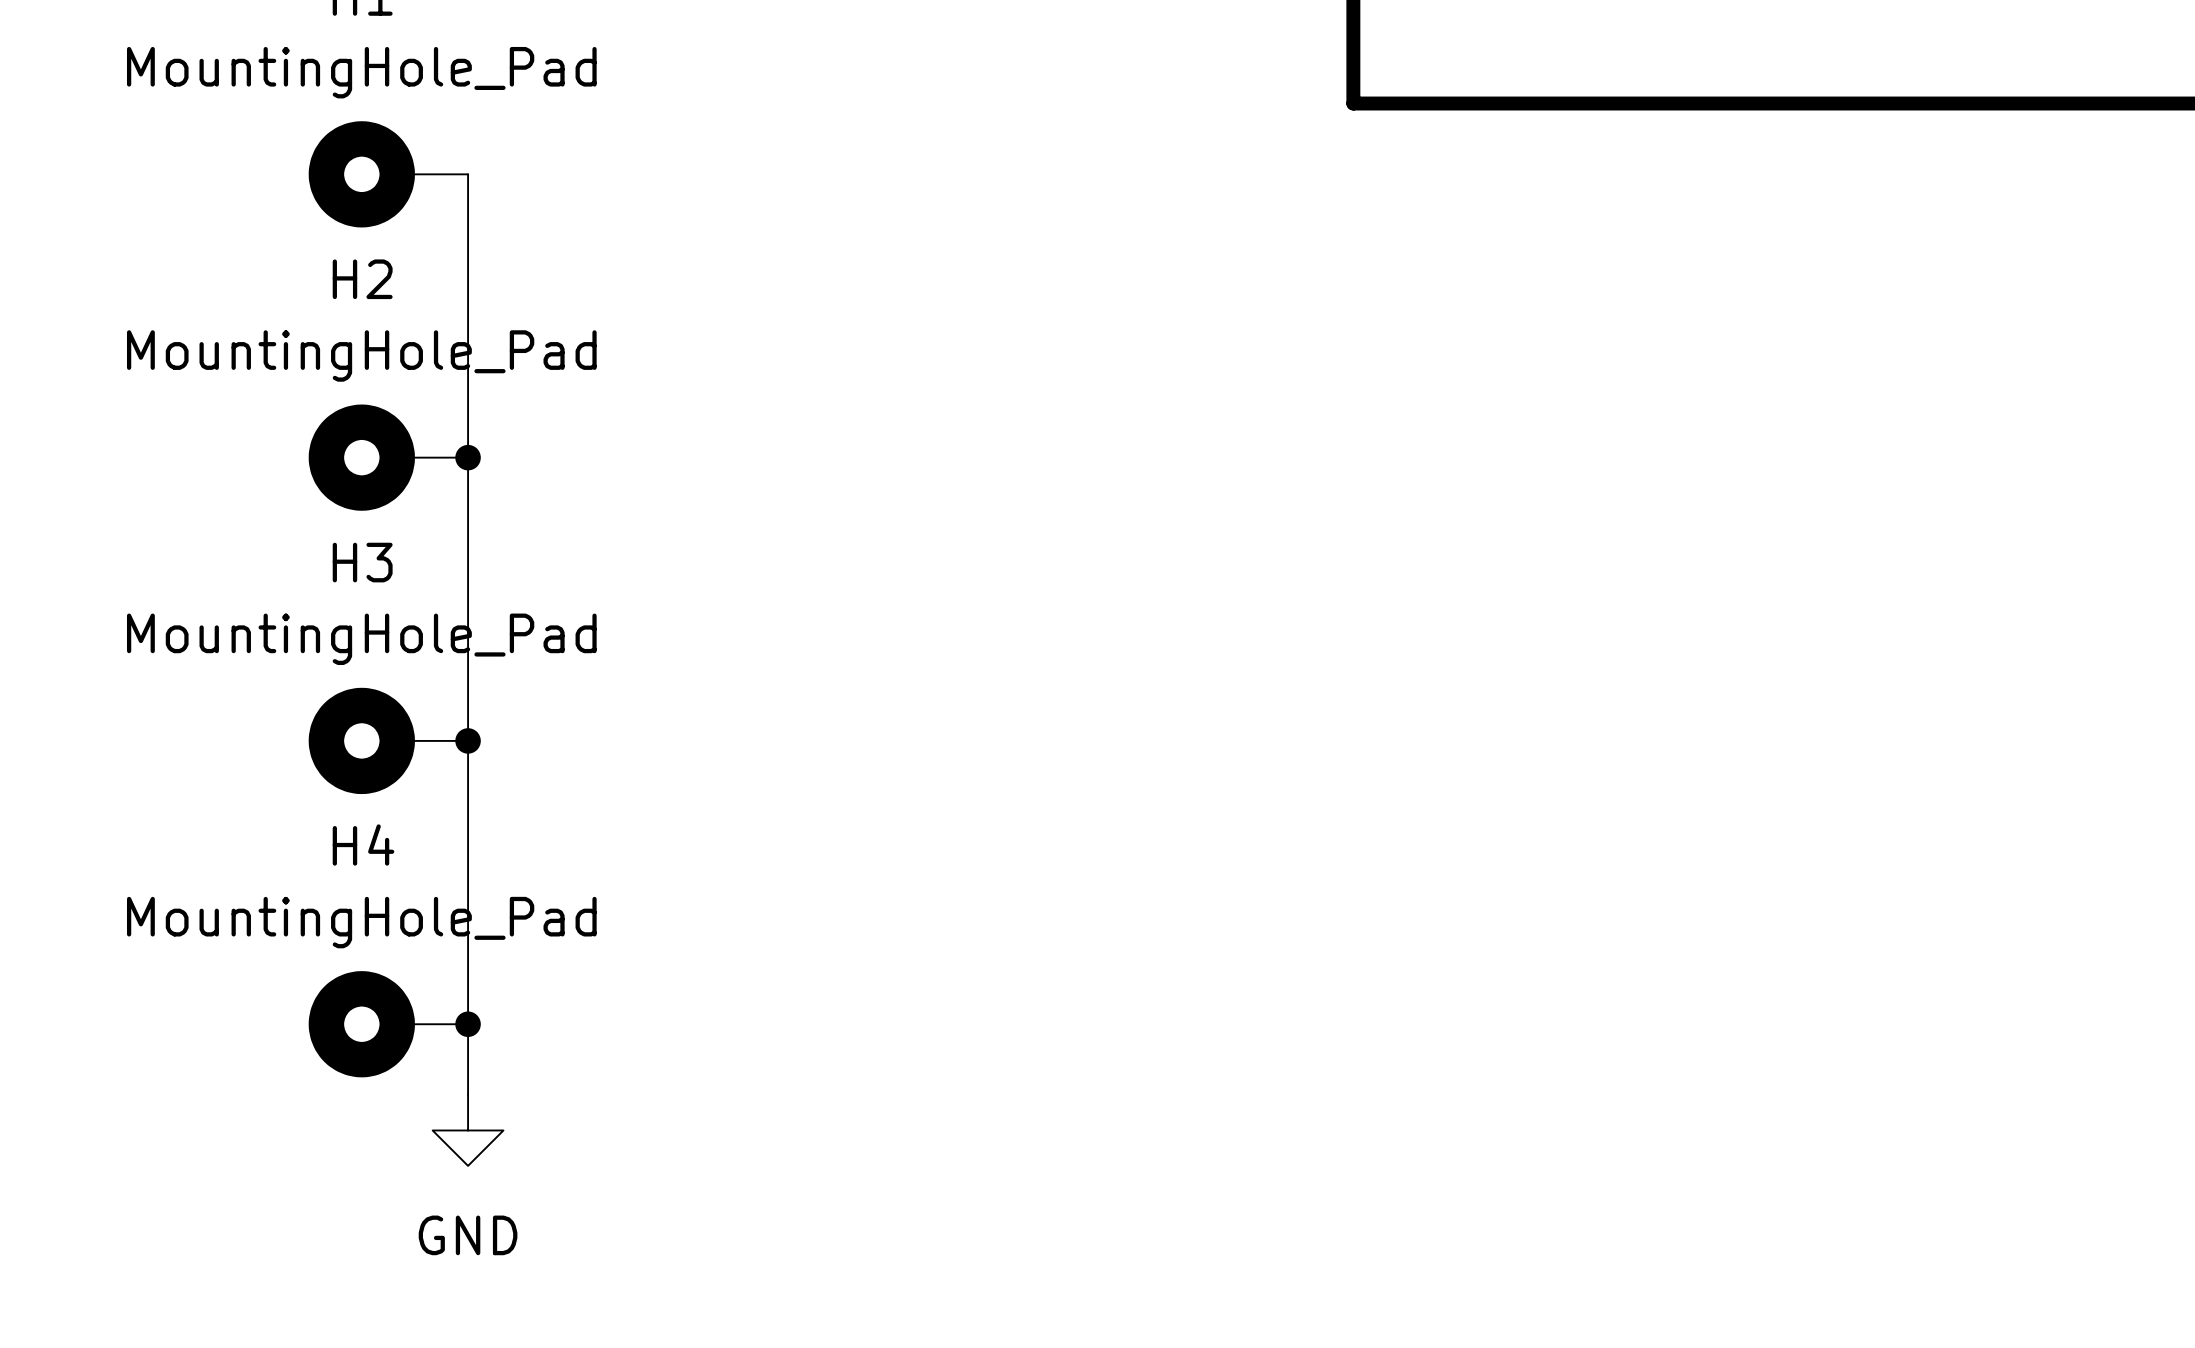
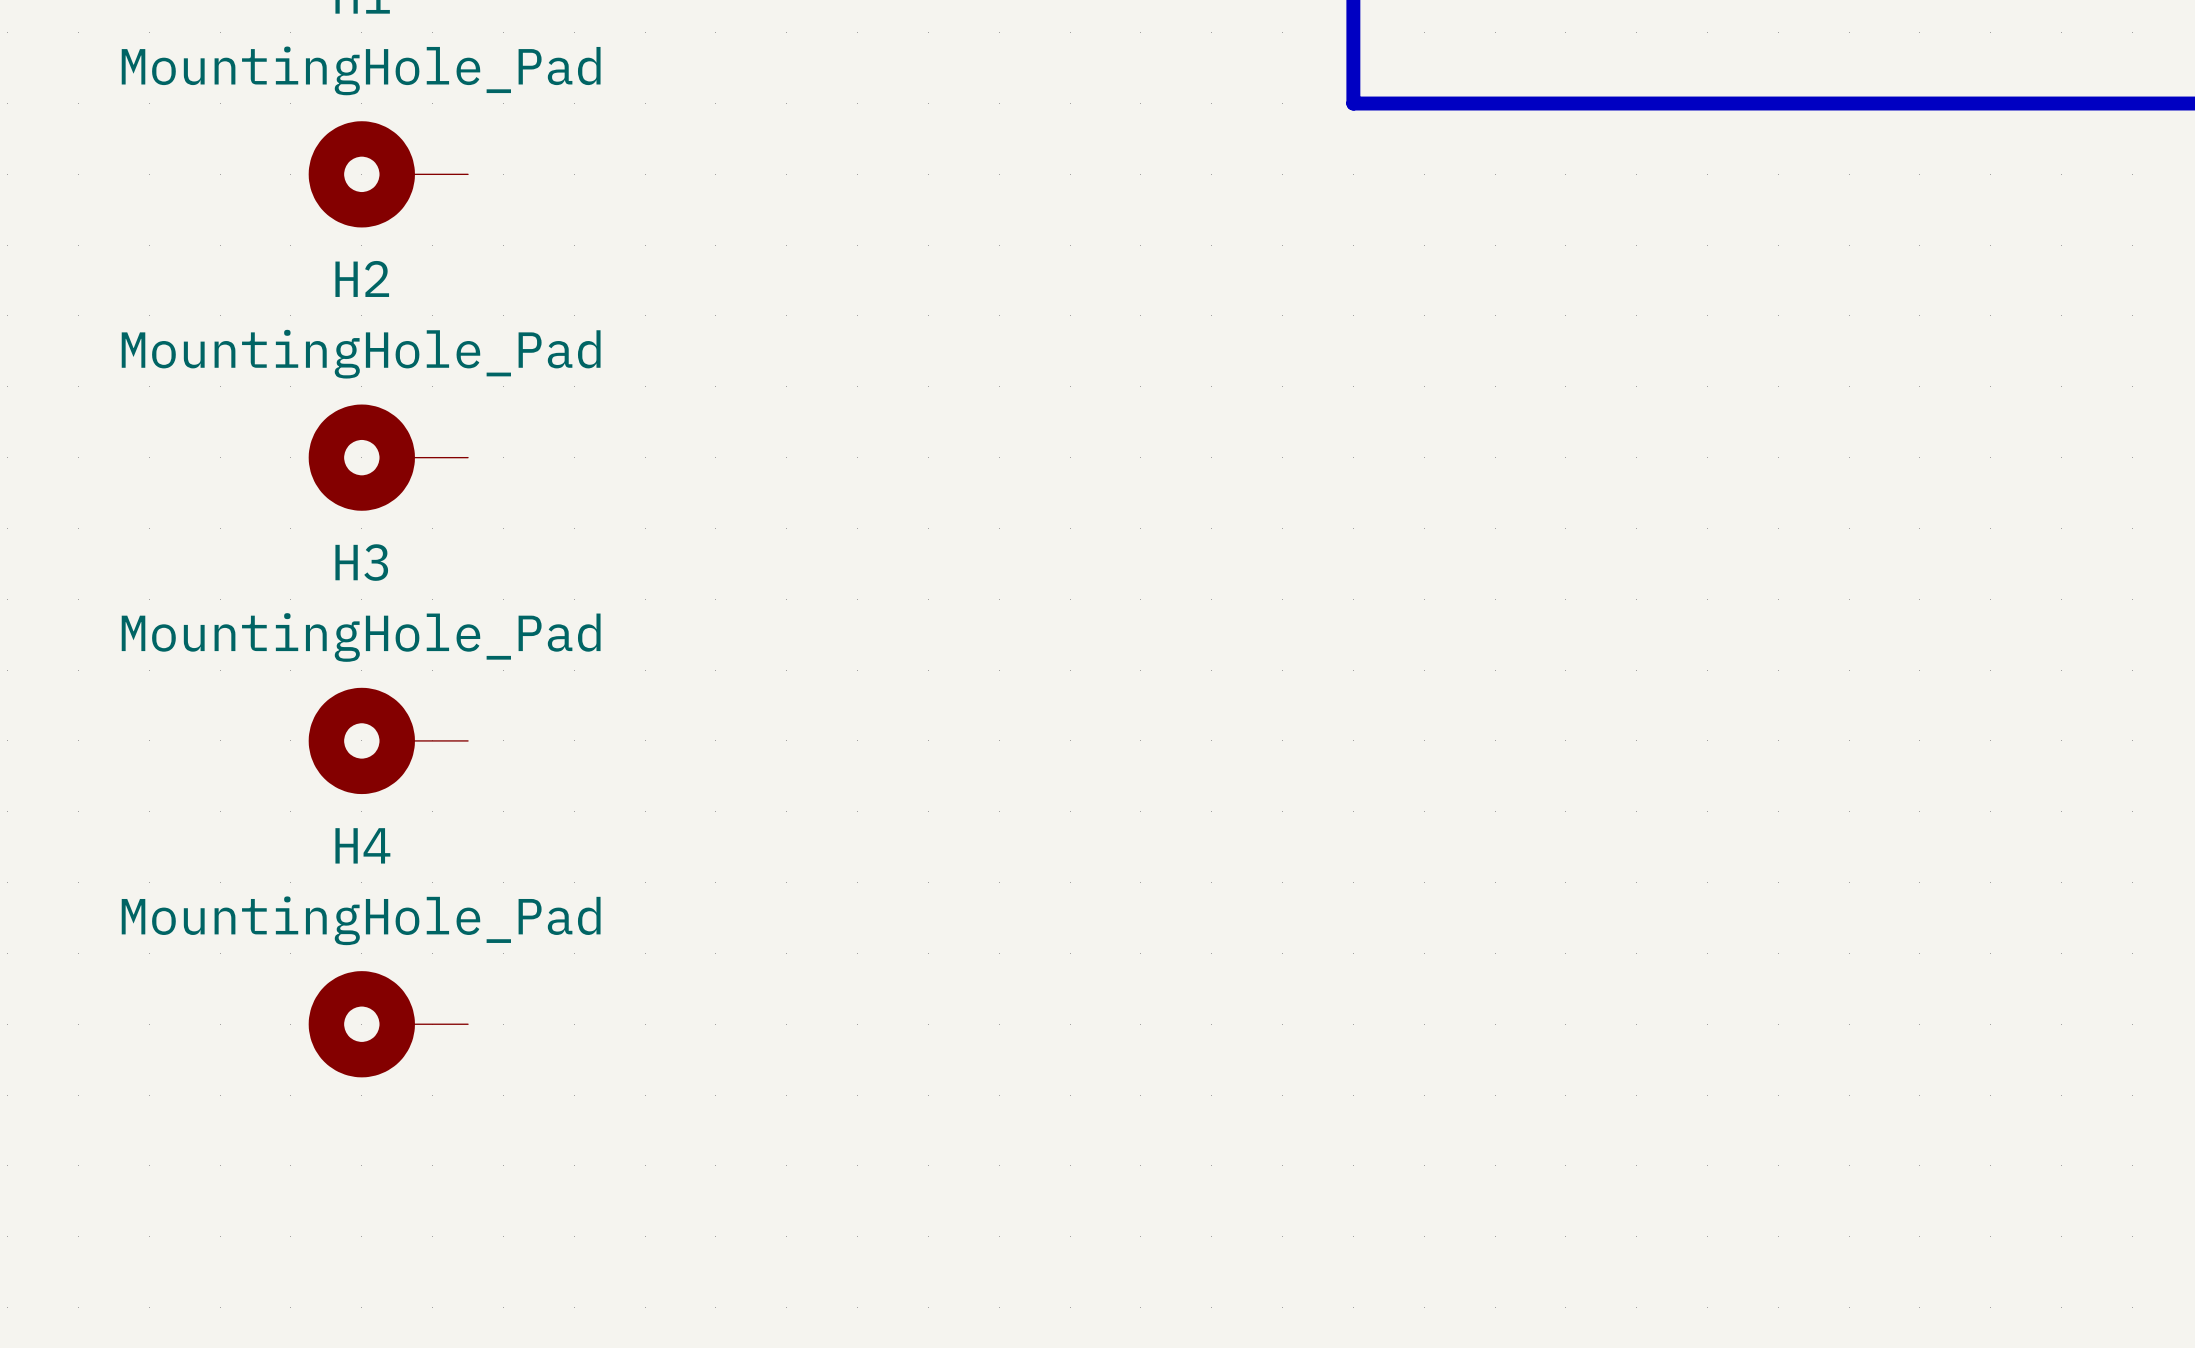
wire: (468, 174) (468, 1095) -> none
junction: (468, 457) -> none
junction: (468, 740) -> none
junction: (468, 1024) -> none
power symbol: GND (468, 1130) -> none

